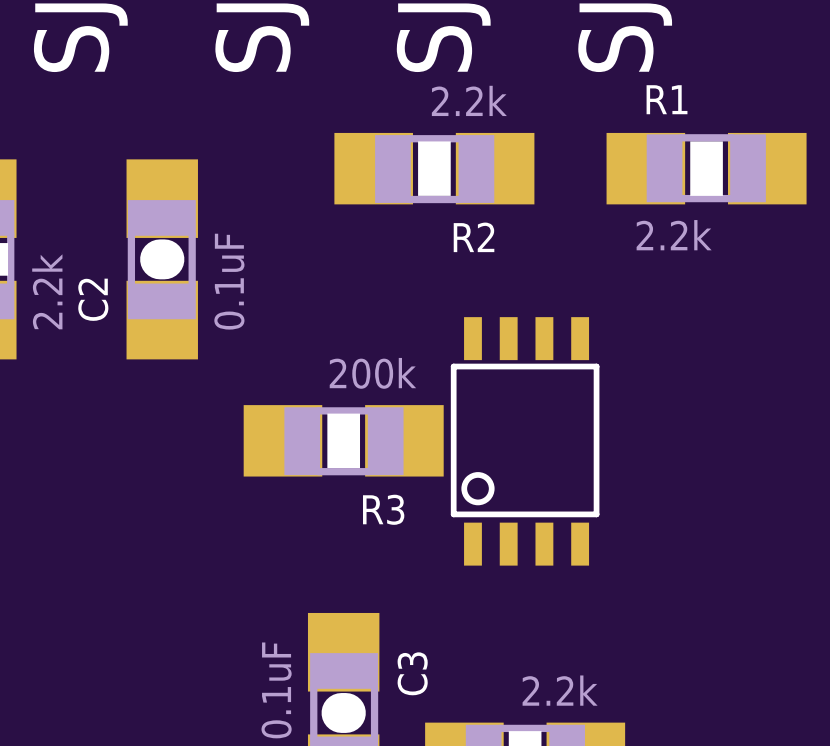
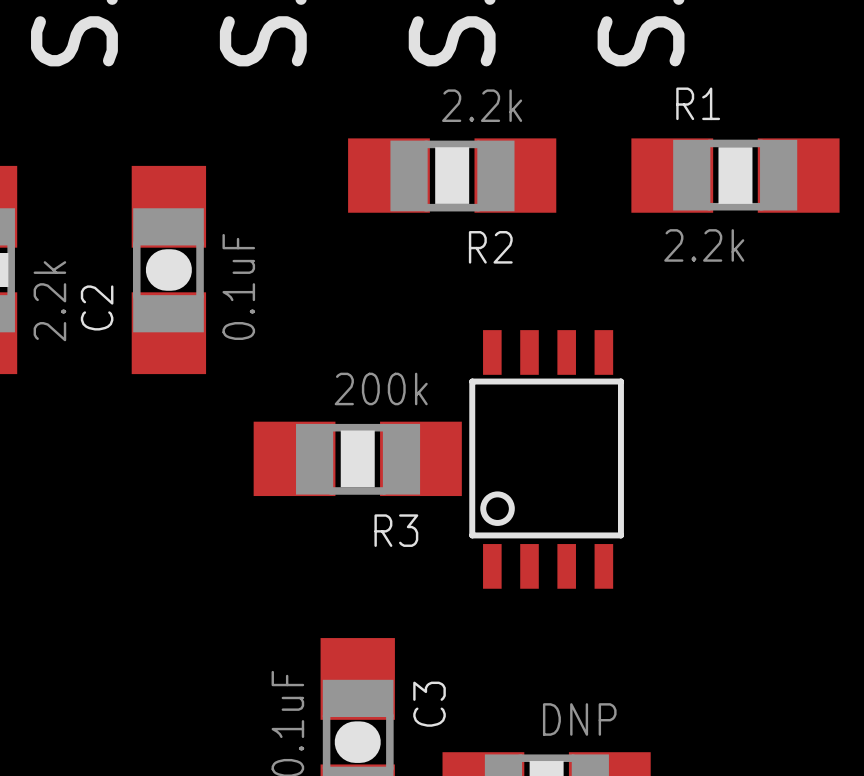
part value: 2.2k (560, 690) -> DNP (579, 719)

